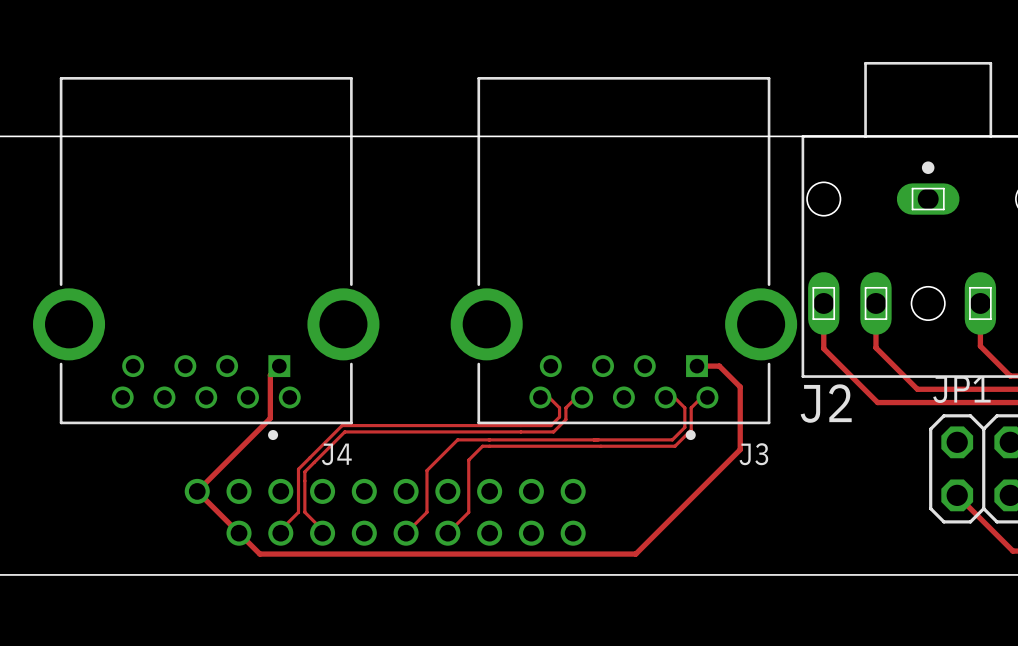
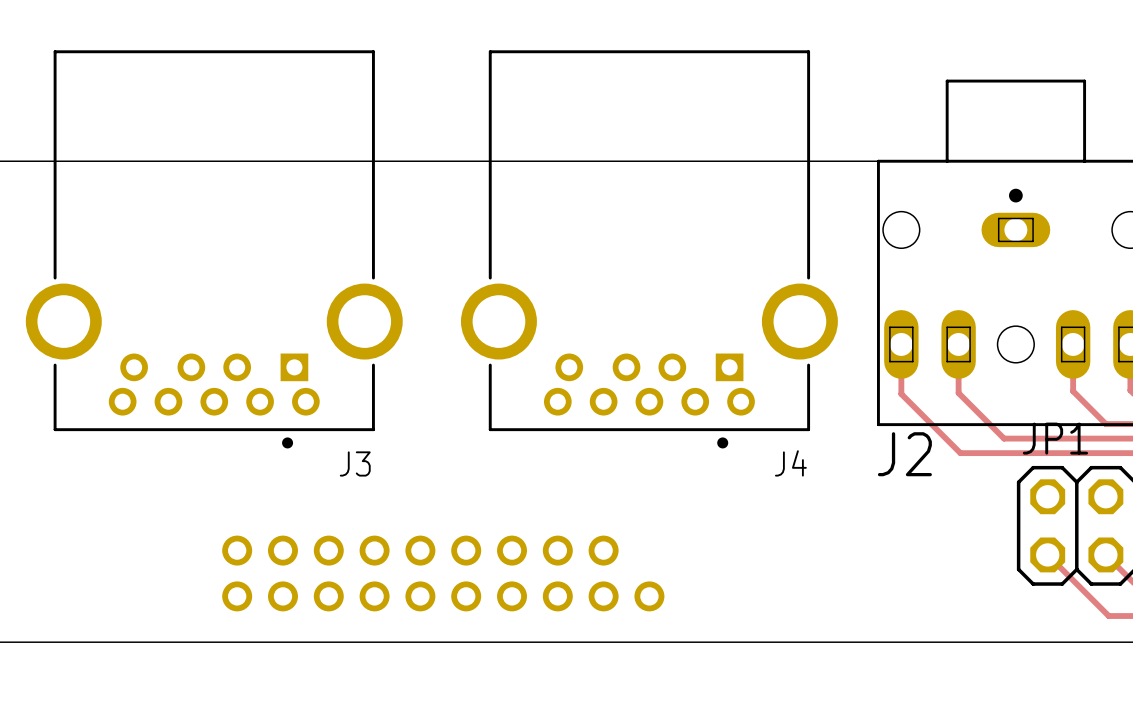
J4 footprint: [33, 77, 380, 441] -> [460, 50, 838, 449]
J3 footprint: [450, 77, 798, 441] -> [25, 50, 403, 449]
track: (279, 366) (270, 375) (270, 418) (197, 491) (259, 554) (635, 554) (740, 449) (740, 386) (719, 366) (697, 366) -> none
track: (540, 397) (549, 397) (559, 407) (559, 417) (550, 425) (342, 425) (298, 469) (298, 512) (280, 529) (280, 533) -> none
track: (582, 397) (576, 397) (565, 407) (565, 419) (553, 431) (344, 431) (304, 471) (304, 512) (322, 529) (322, 533) -> none
track: (665, 397) (674, 397) (684, 407) (684, 427) (672, 439) (457, 439) (426, 470) (426, 512) (406, 533) -> none
track: (707, 397) (701, 397) (691, 407) (691, 430) (675, 446) (482, 446) (468, 460) (468, 512) (447, 533) -> none
part footprint: [184, 478, 586, 546] -> [222, 535, 665, 612]

